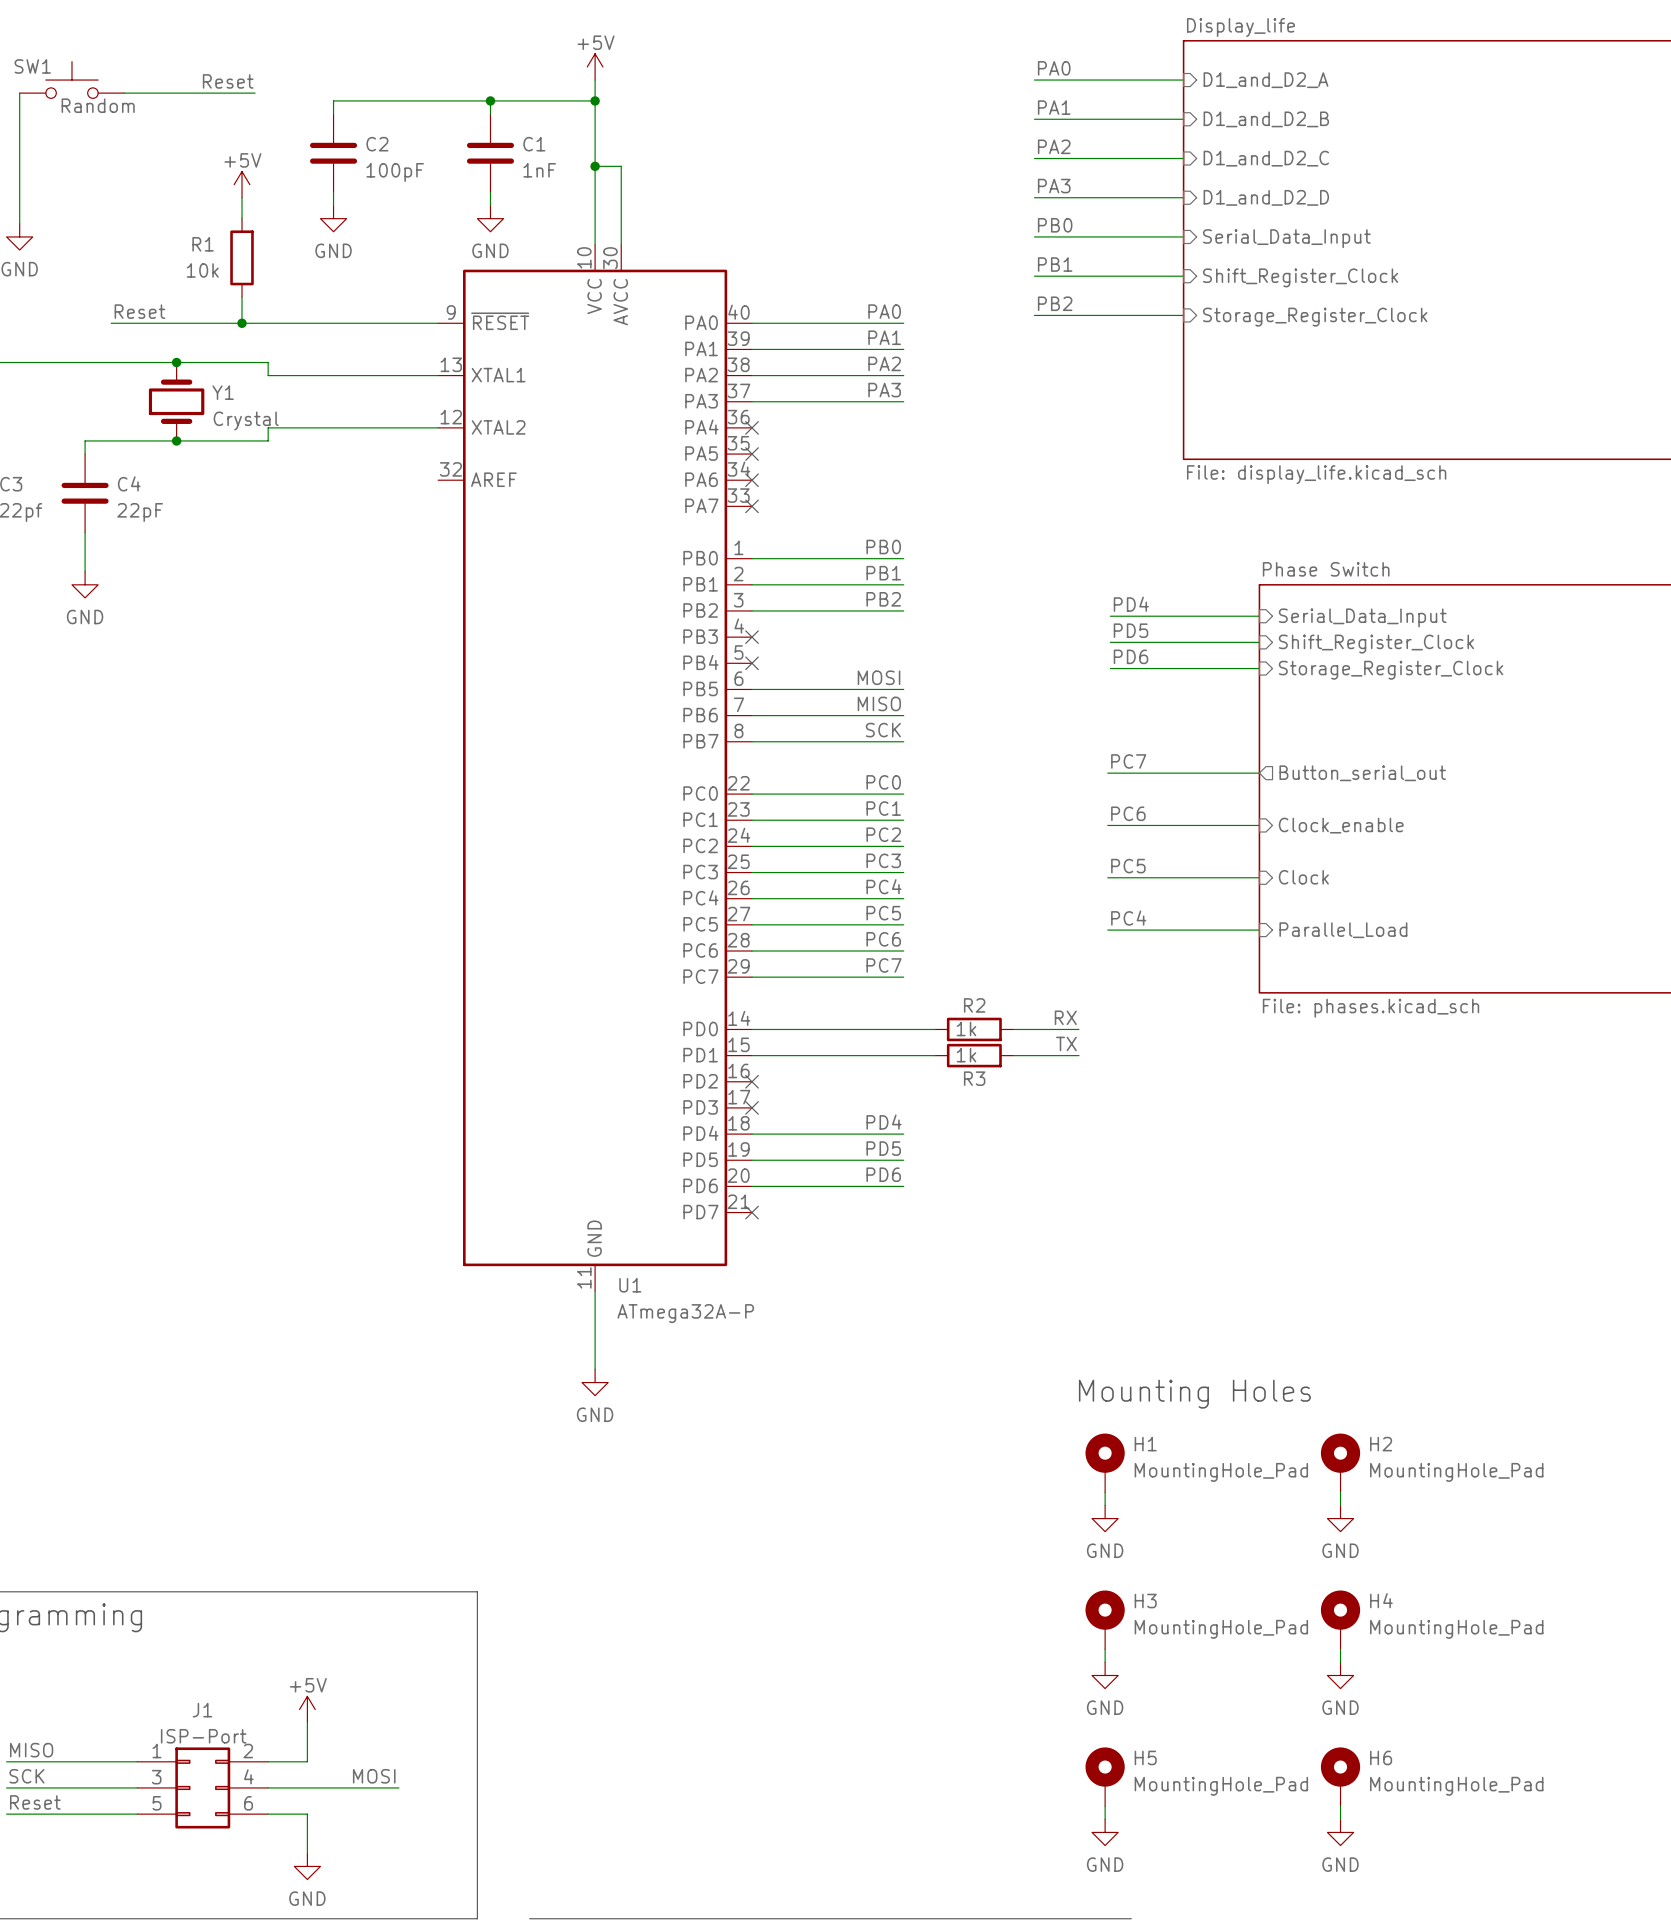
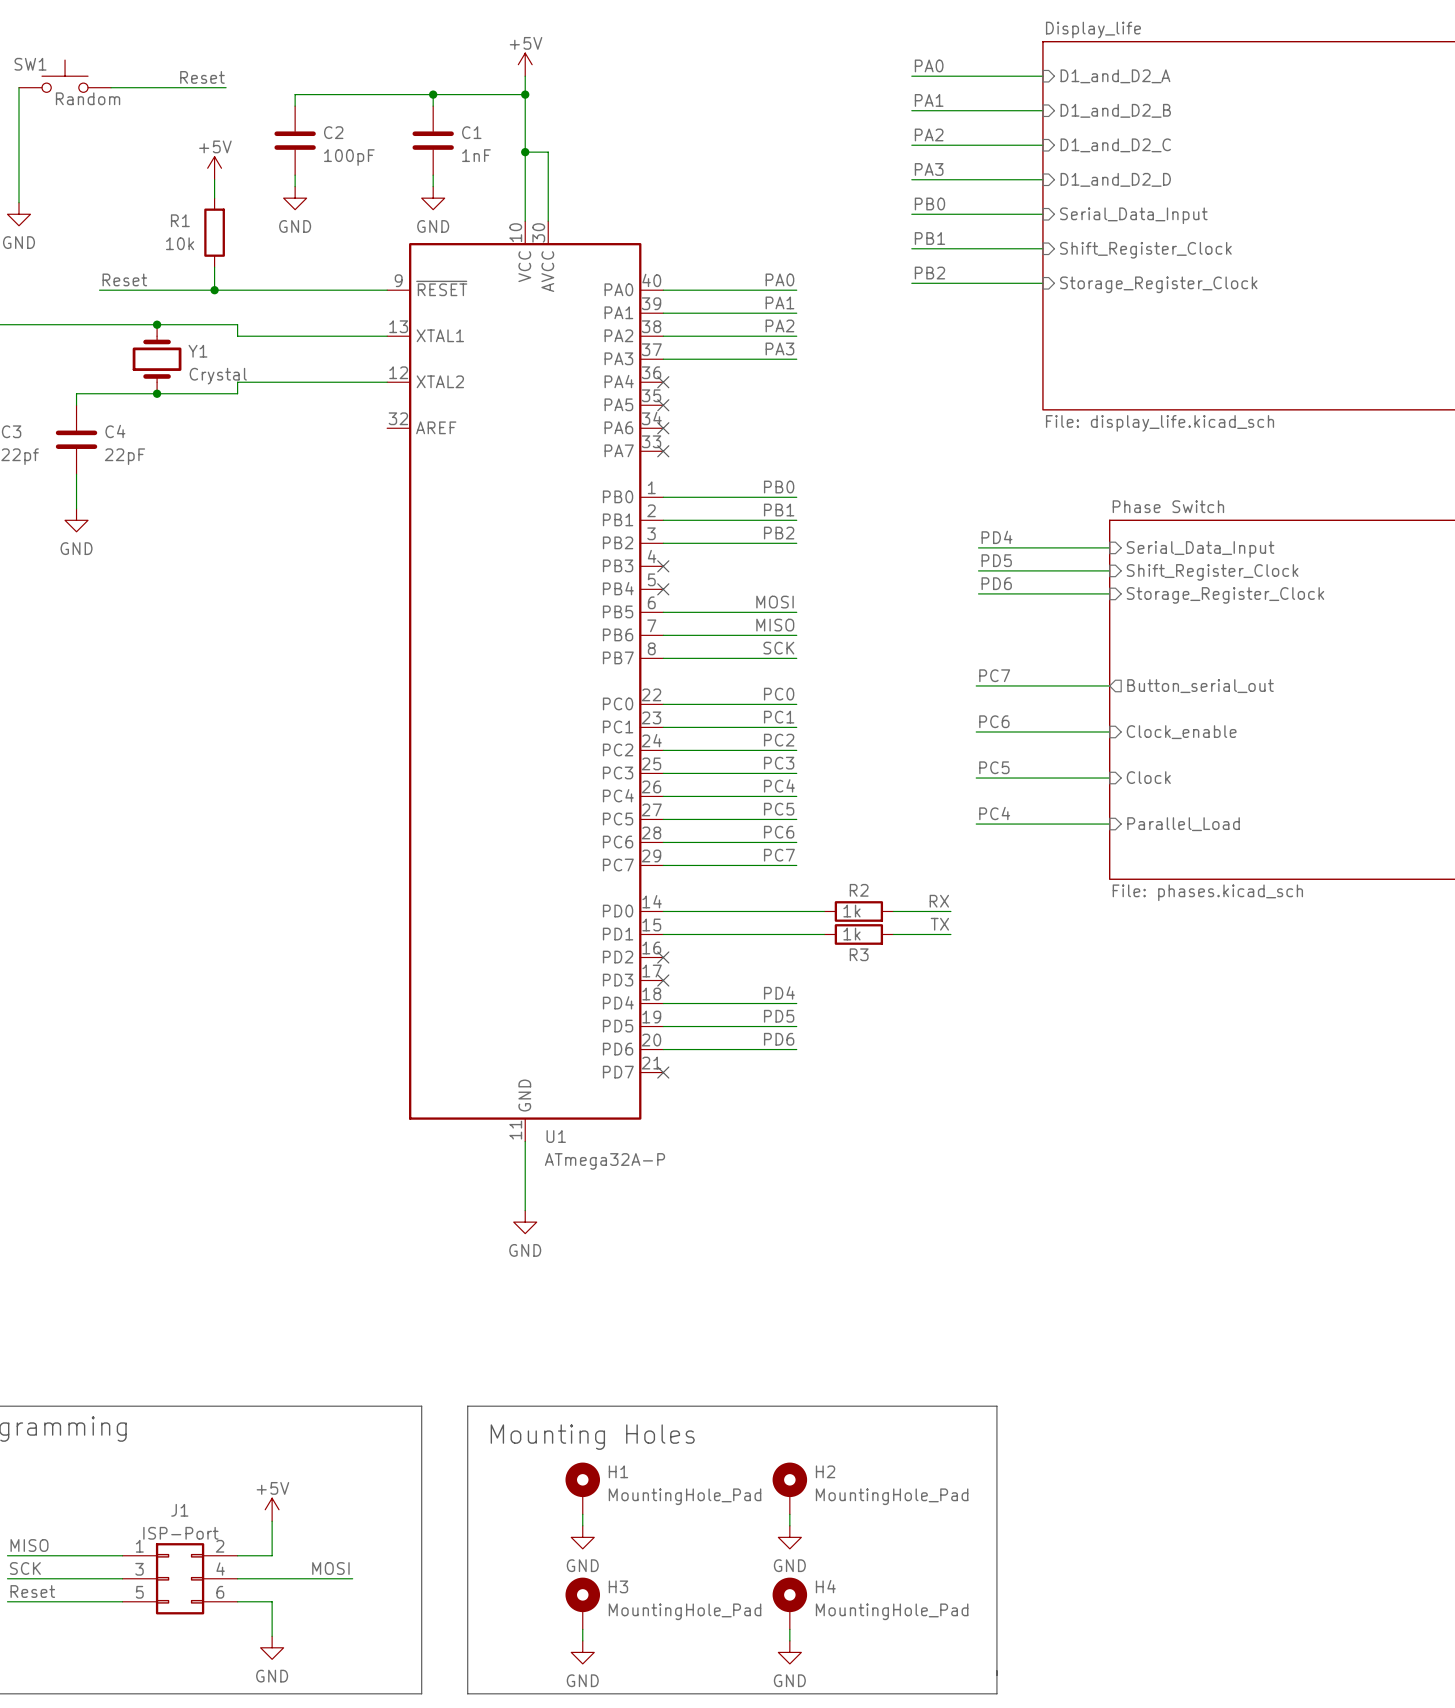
text: Mounting Holes (1194, 1394) -> none
H1 position: (1105, 1462) -> (582, 1488)
H2 position: (1340, 1462) -> (789, 1488)
wire: (1105, 1492) (1105, 1505) -> none
wire: (1340, 1492) (1340, 1505) -> none
power symbol: GND (1105, 1518) -> none
power symbol: GND (1340, 1518) -> none
H3 position: (1105, 1619) -> (582, 1603)
H4 position: (1340, 1619) -> (789, 1603)
text: none -> Mounting Holes (592, 1437)
wire: (1105, 1649) (1105, 1662) -> (789, 1514) (789, 1525)
wire: (1340, 1649) (1340, 1662) -> none
power symbol: GND (1105, 1675) -> none
power symbol: GND (1340, 1675) -> none
wire: none -> (582, 1514) (582, 1525)
power symbol: none -> GND (582, 1537)
power symbol: none -> GND (789, 1537)
H5: MountingHole_Pad (1105, 1776) -> none
H6: MountingHole_Pad (1340, 1776) -> none
wire: (1105, 1806) (1105, 1819) -> (789, 1629) (789, 1640)
wire: (1340, 1806) (1340, 1819) -> none
power symbol: GND (1105, 1832) -> none
power symbol: GND (1340, 1832) -> none
wire: none -> (582, 1629) (582, 1640)
power symbol: none -> GND (582, 1652)
power symbol: none -> GND (789, 1652)
line: none -> (467, 1693) (467, 1406) (996, 1406) (996, 1693)

